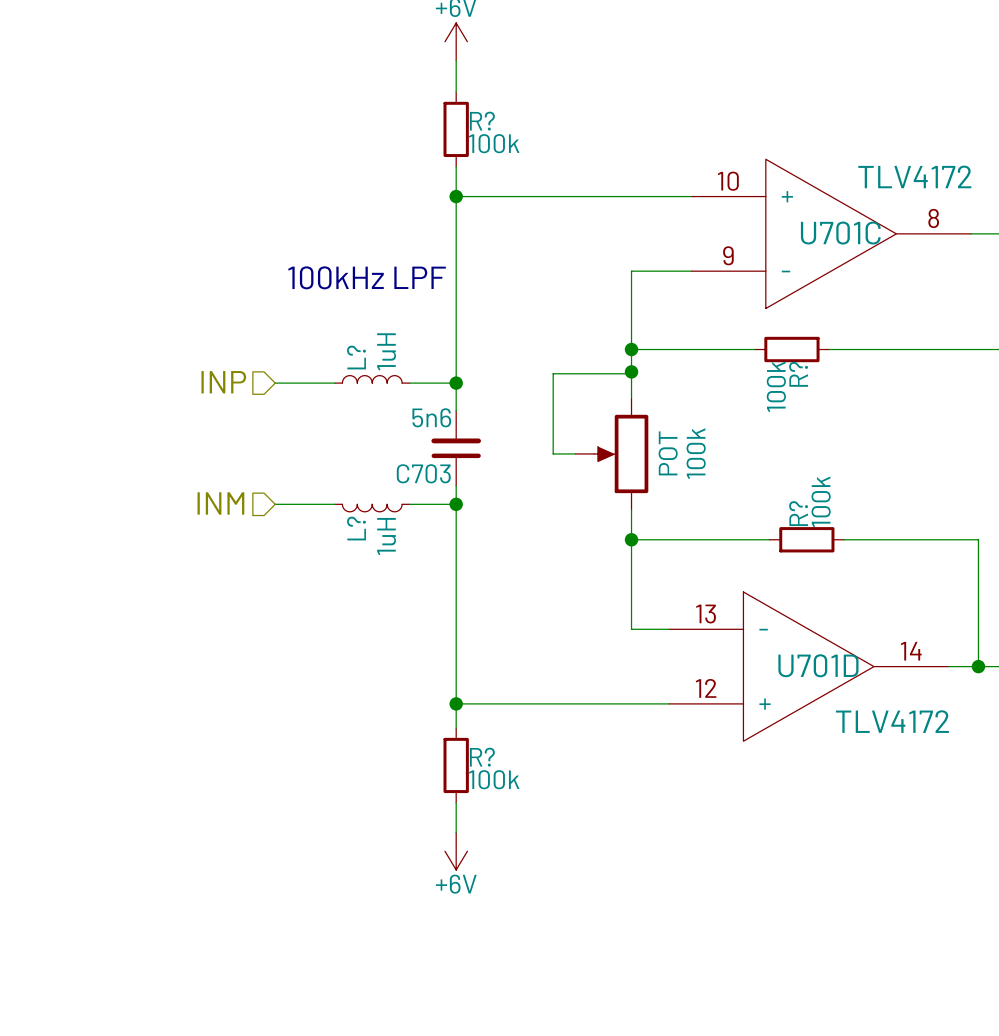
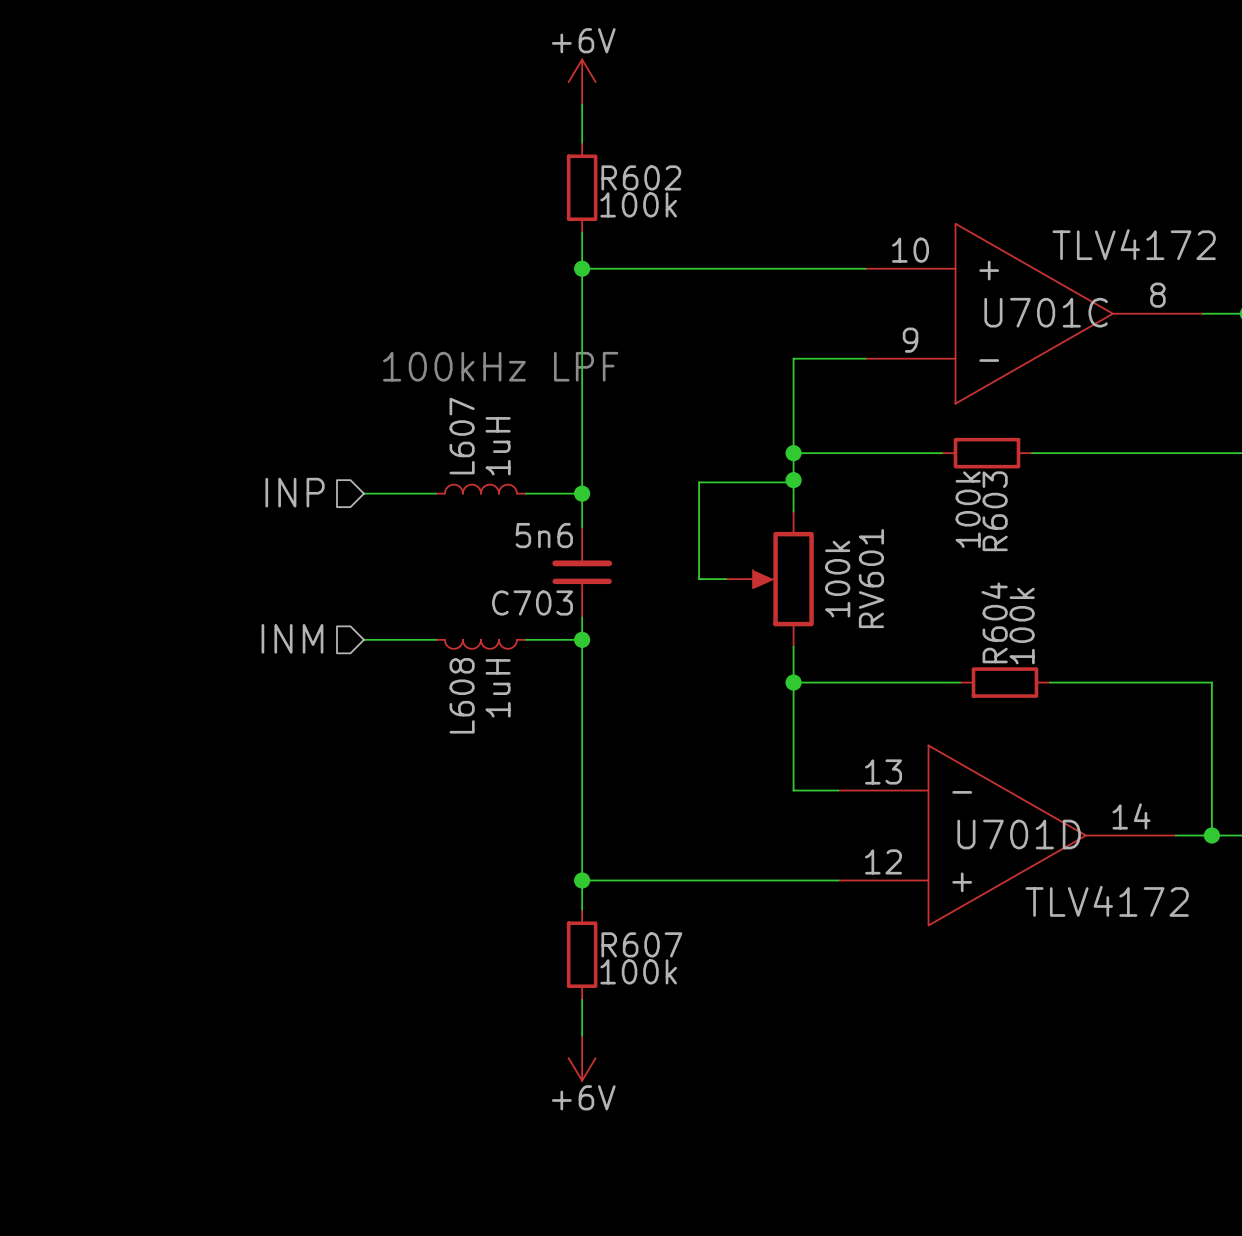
R? name: R? (482, 121) -> R602 (641, 177)
L? name: L? (356, 357) -> L607 (462, 436)
R? name: R? (798, 374) -> R603 (995, 511)
100k value: POT (668, 453) -> 100k (837, 579)
100k name: 100k (696, 453) -> RV601 (871, 578)
R? name: R? (798, 513) -> R604 (994, 622)
L? name: L? (356, 528) -> L608 (462, 695)
R? name: R? (482, 757) -> R607 (641, 944)

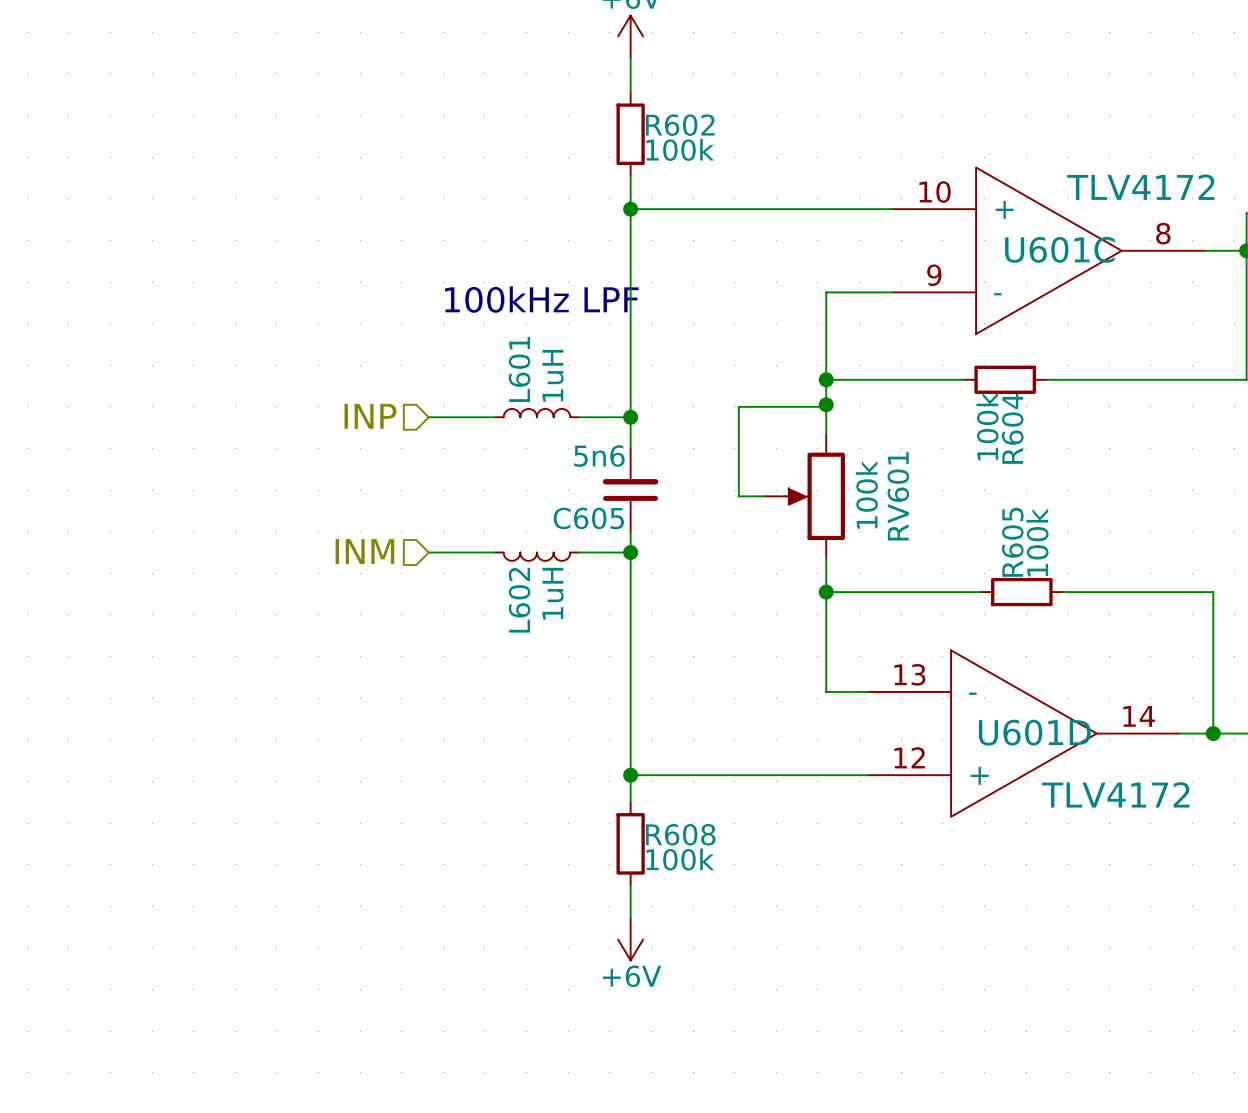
U701C name: U701C (1046, 312) -> U601C (1059, 249)
L607 name: L607 (462, 436) -> L601 (519, 369)
R603 name: R603 (995, 511) -> R604 (1012, 428)
C703 name: C703 (532, 603) -> C605 (588, 518)
R604 name: R604 (994, 622) -> R605 (1012, 542)
L608 name: L608 (462, 695) -> L602 (519, 600)
U701D name: U701D (1019, 834) -> U601D (1034, 732)
R607 name: R607 (641, 944) -> R608 (680, 834)

